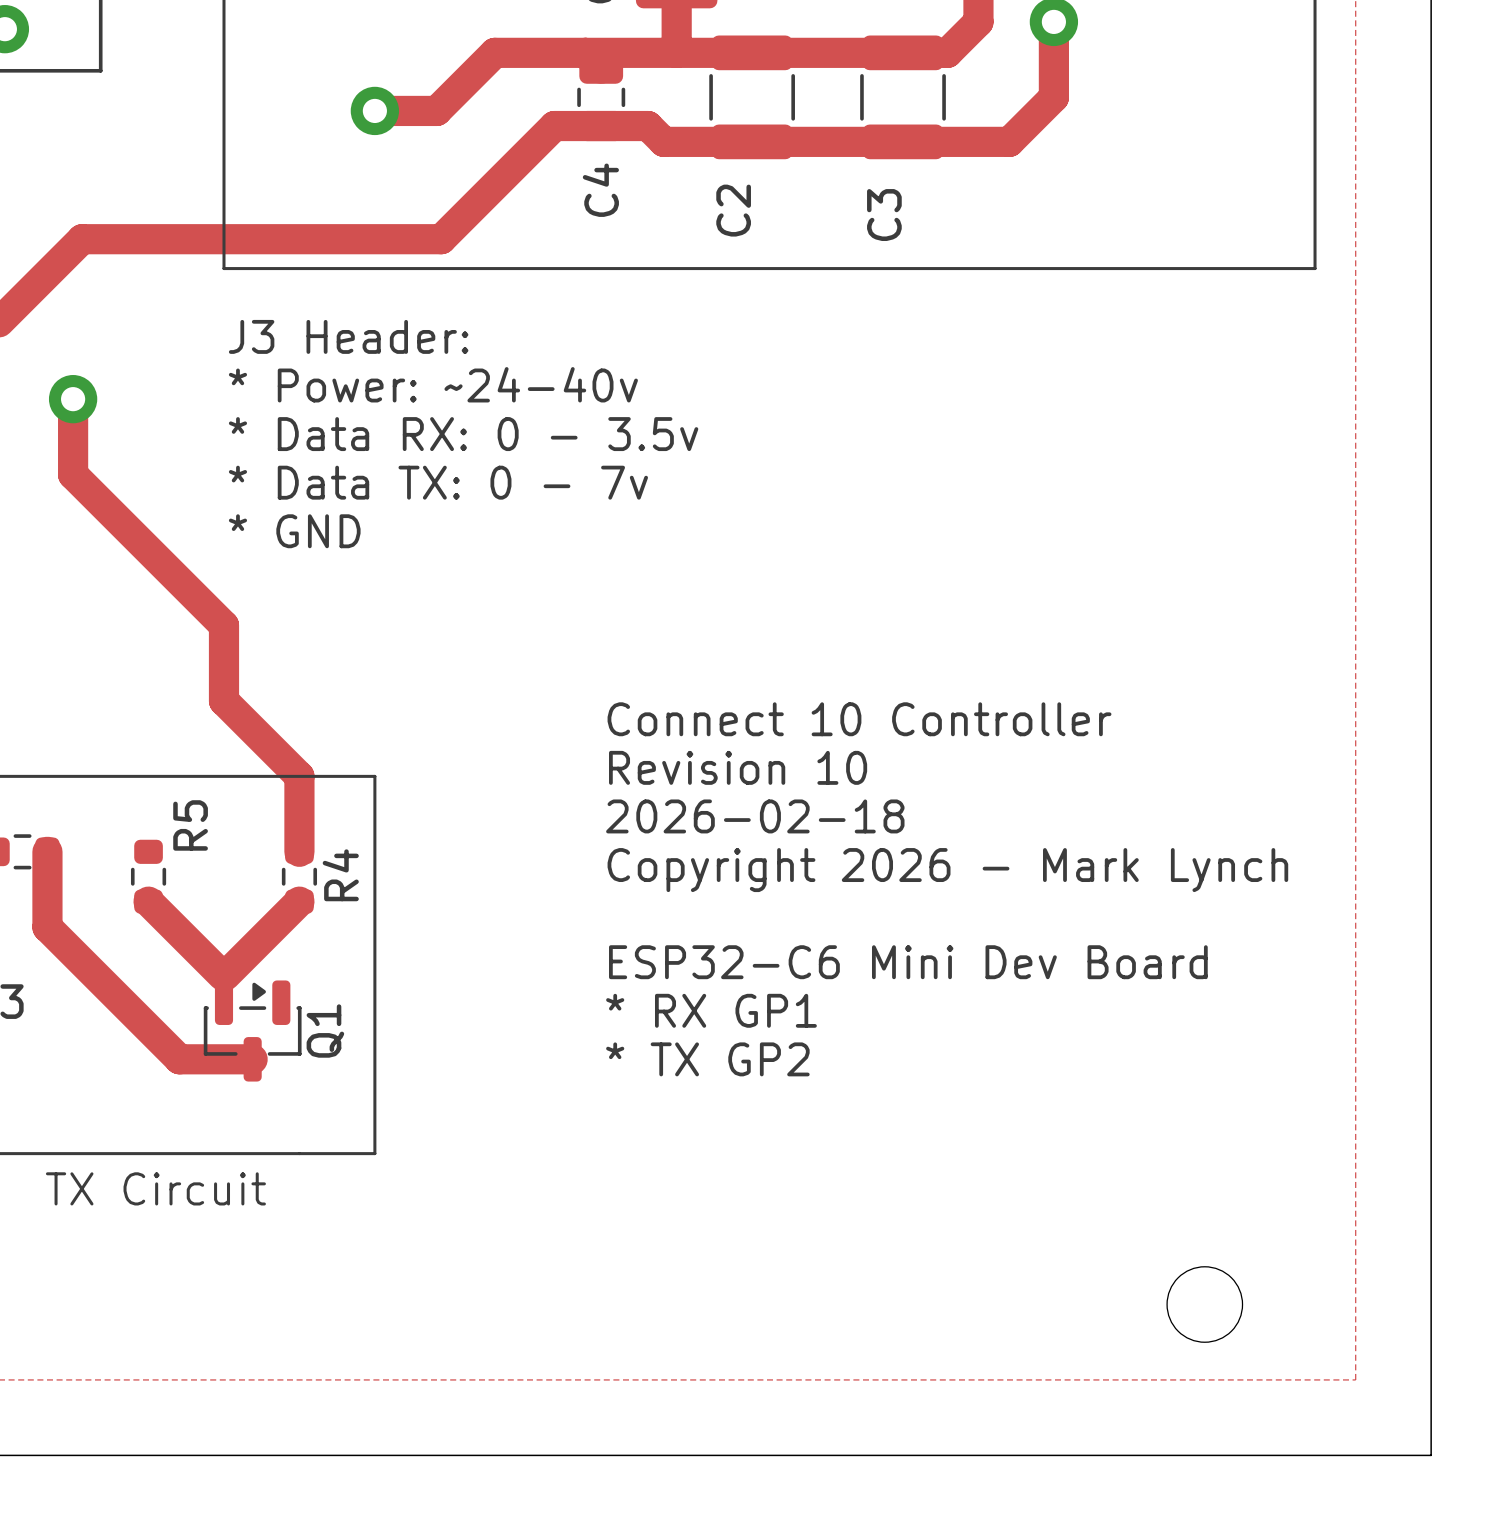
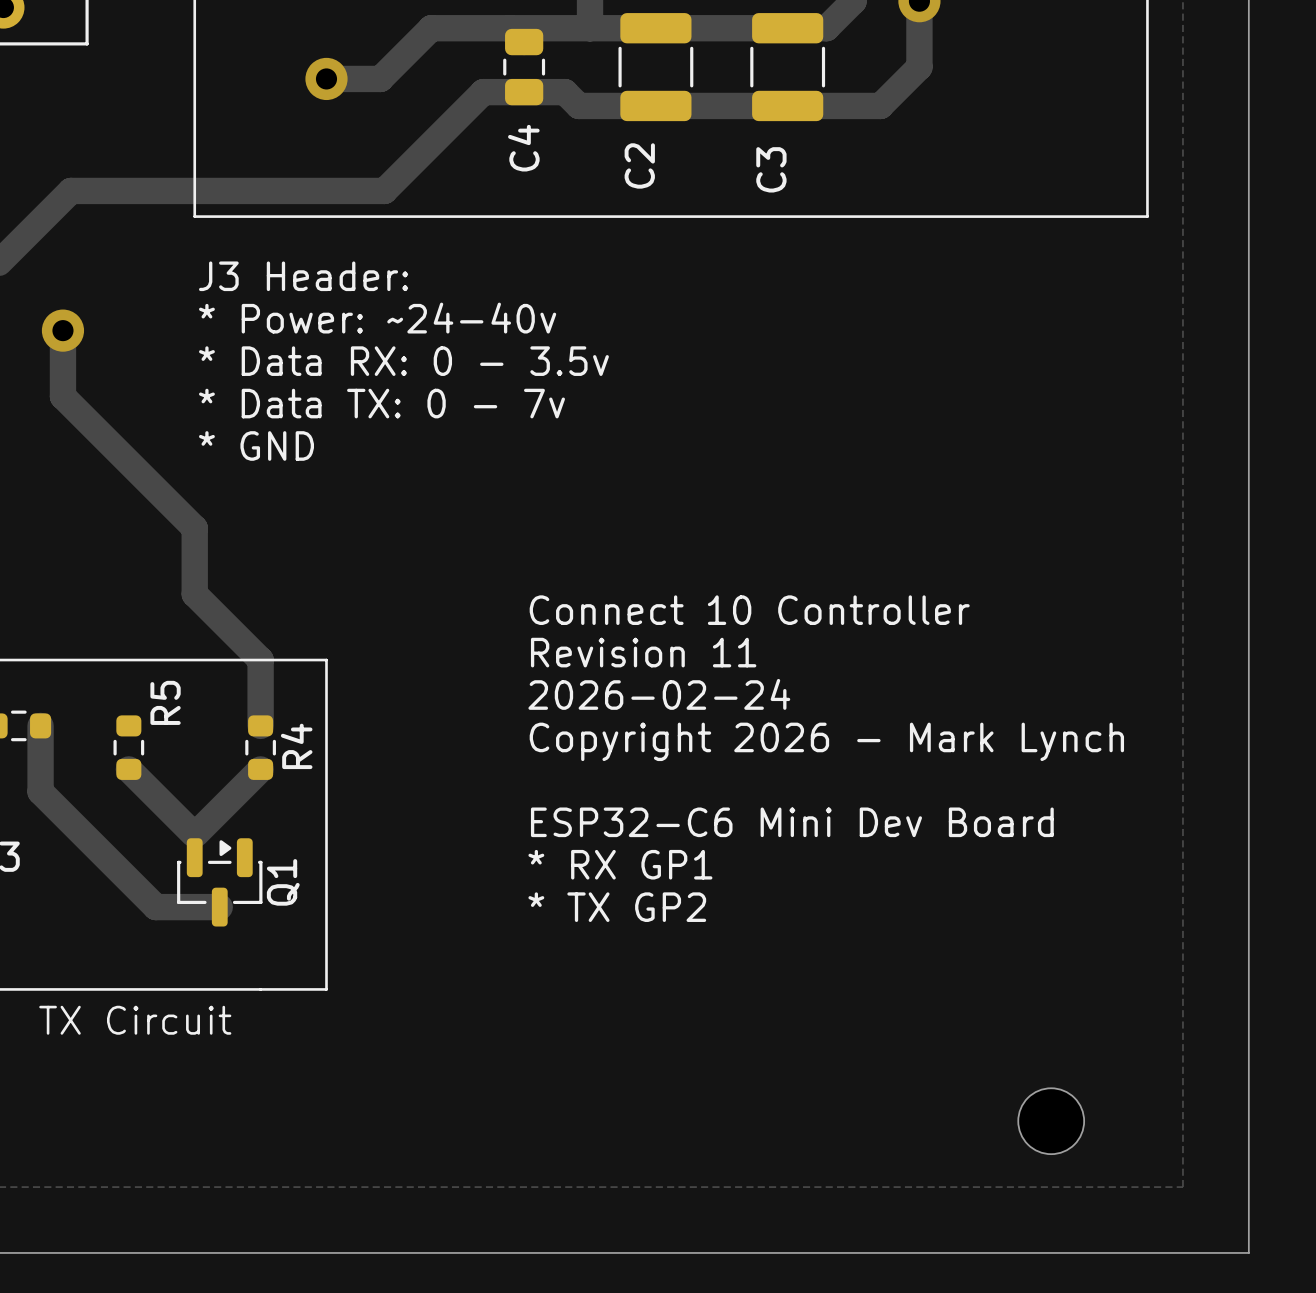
text: Revision 10 (738, 767) -> Revision 11 (643, 652)
text: 2026-02-18 (755, 816) -> 2026-02-24 (659, 694)

